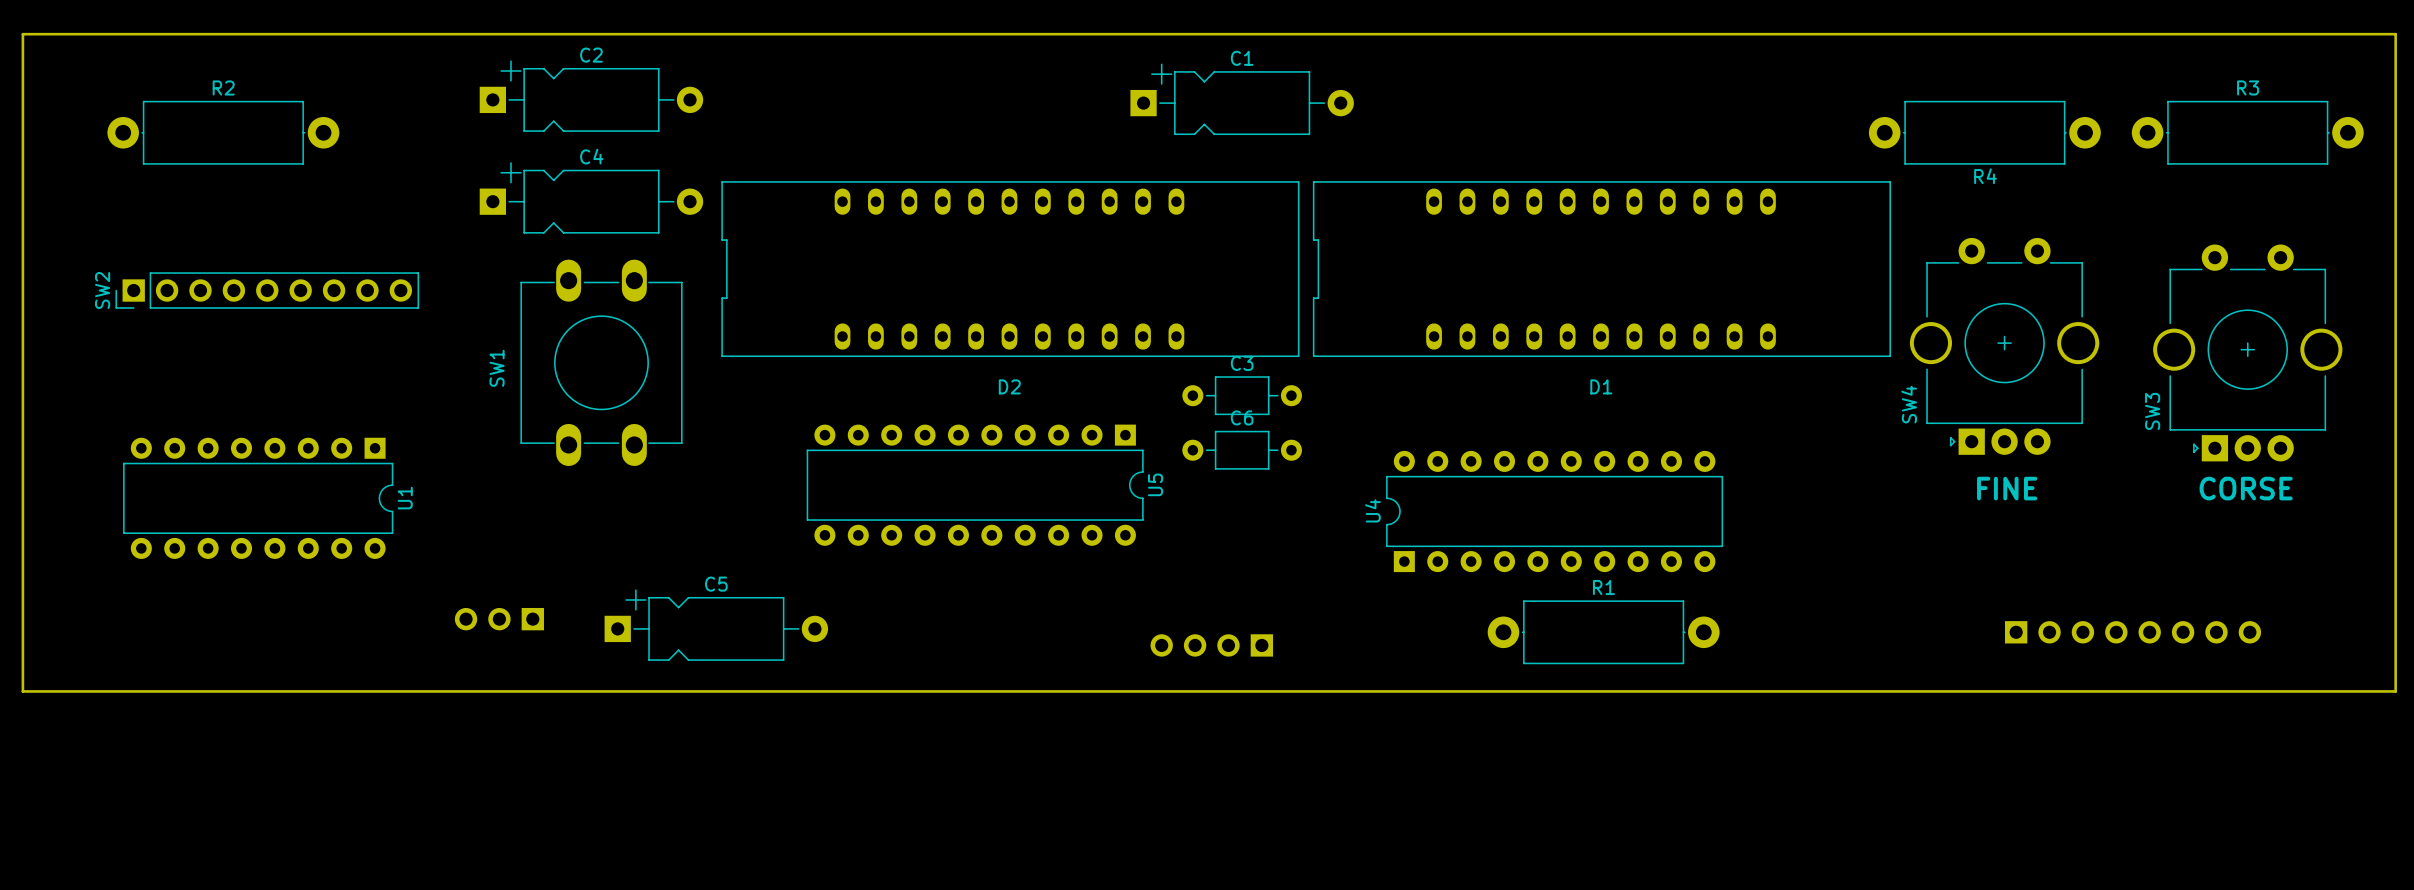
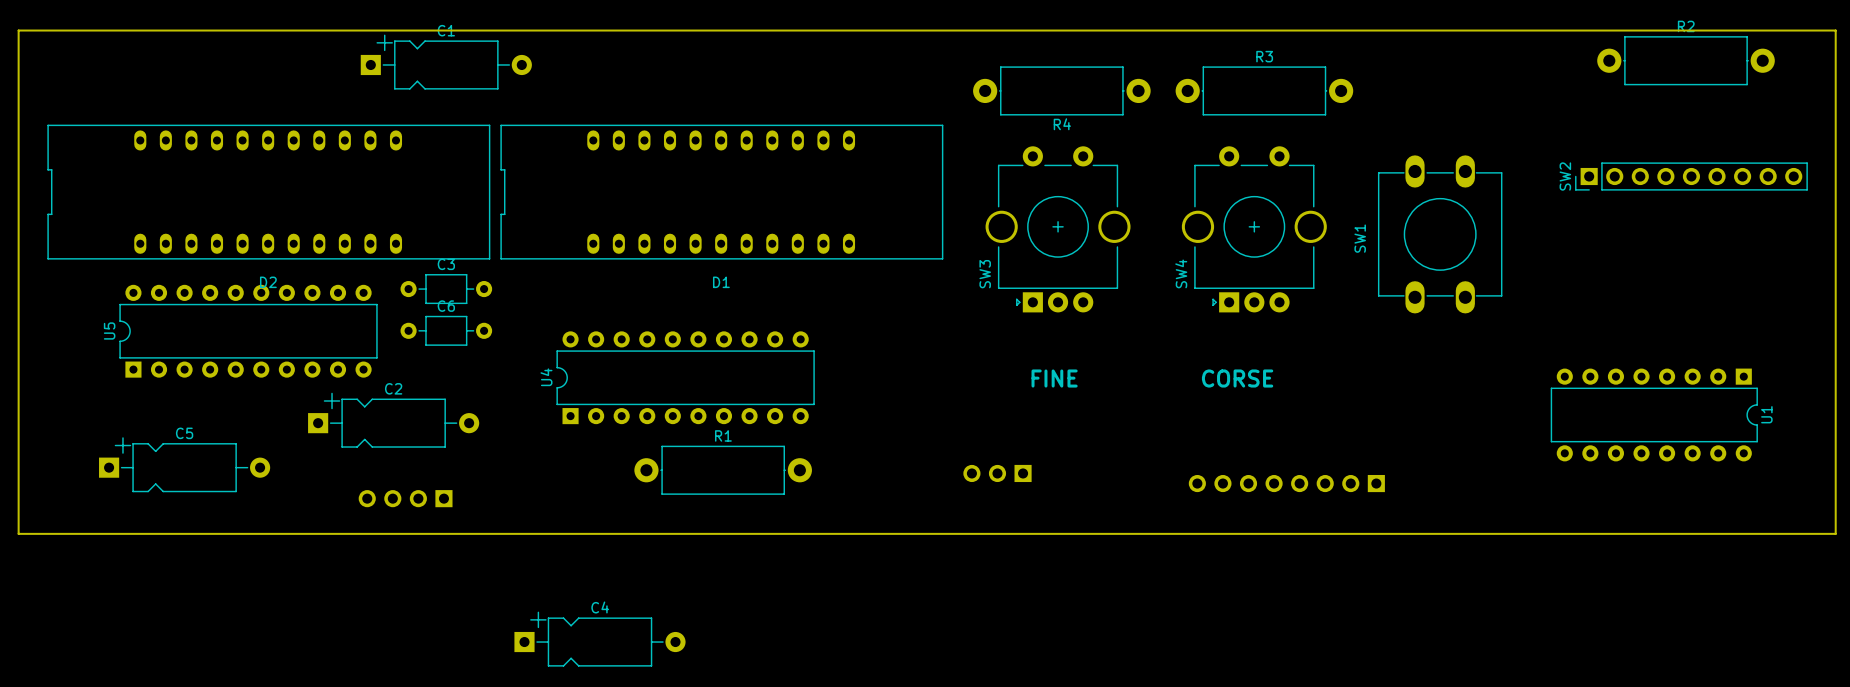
C2 position: (591, 96) -> (393, 420)
C1 position: (1242, 99) -> (446, 62)
R2 position: (223, 132) -> (1686, 60)
R4 position: (1984, 132) -> (1061, 90)
R3 position: (2247, 132) -> (1264, 90)
C4 position: (591, 197) -> (600, 639)
D2 position: (1010, 269) -> (268, 192)
D1 position: (1601, 269) -> (721, 192)
SW2 position: (267, 290) -> (1691, 176)
SW4 position: (2004, 346) -> (1254, 229)
SW3 position: (2247, 352) -> (1058, 229)
SW1 position: (601, 362) -> (1440, 234)
C3 position: (1242, 395) -> (446, 289)
C6 position: (1242, 450) -> (446, 330)
U5 rotation: 0° (975, 485) -> 180° (248, 331)
U5 position: (975, 485) -> (248, 331)
text: none -> FINE (1054, 378)
text: none -> CORSE (1237, 378)
text: FINE (2007, 488) -> none
text: CORSE (2246, 488) -> none
U1 position: (258, 498) -> (1654, 414)
U4 position: (1554, 511) -> (685, 377)
part: none -> (997, 473)
part: (499, 619) -> none
C5 position: (716, 625) -> (184, 464)
part: none -> (1286, 483)
R1 position: (1603, 632) -> (723, 470)
part: (2133, 632) -> none
part: none -> (405, 498)
part: (1211, 645) -> none

